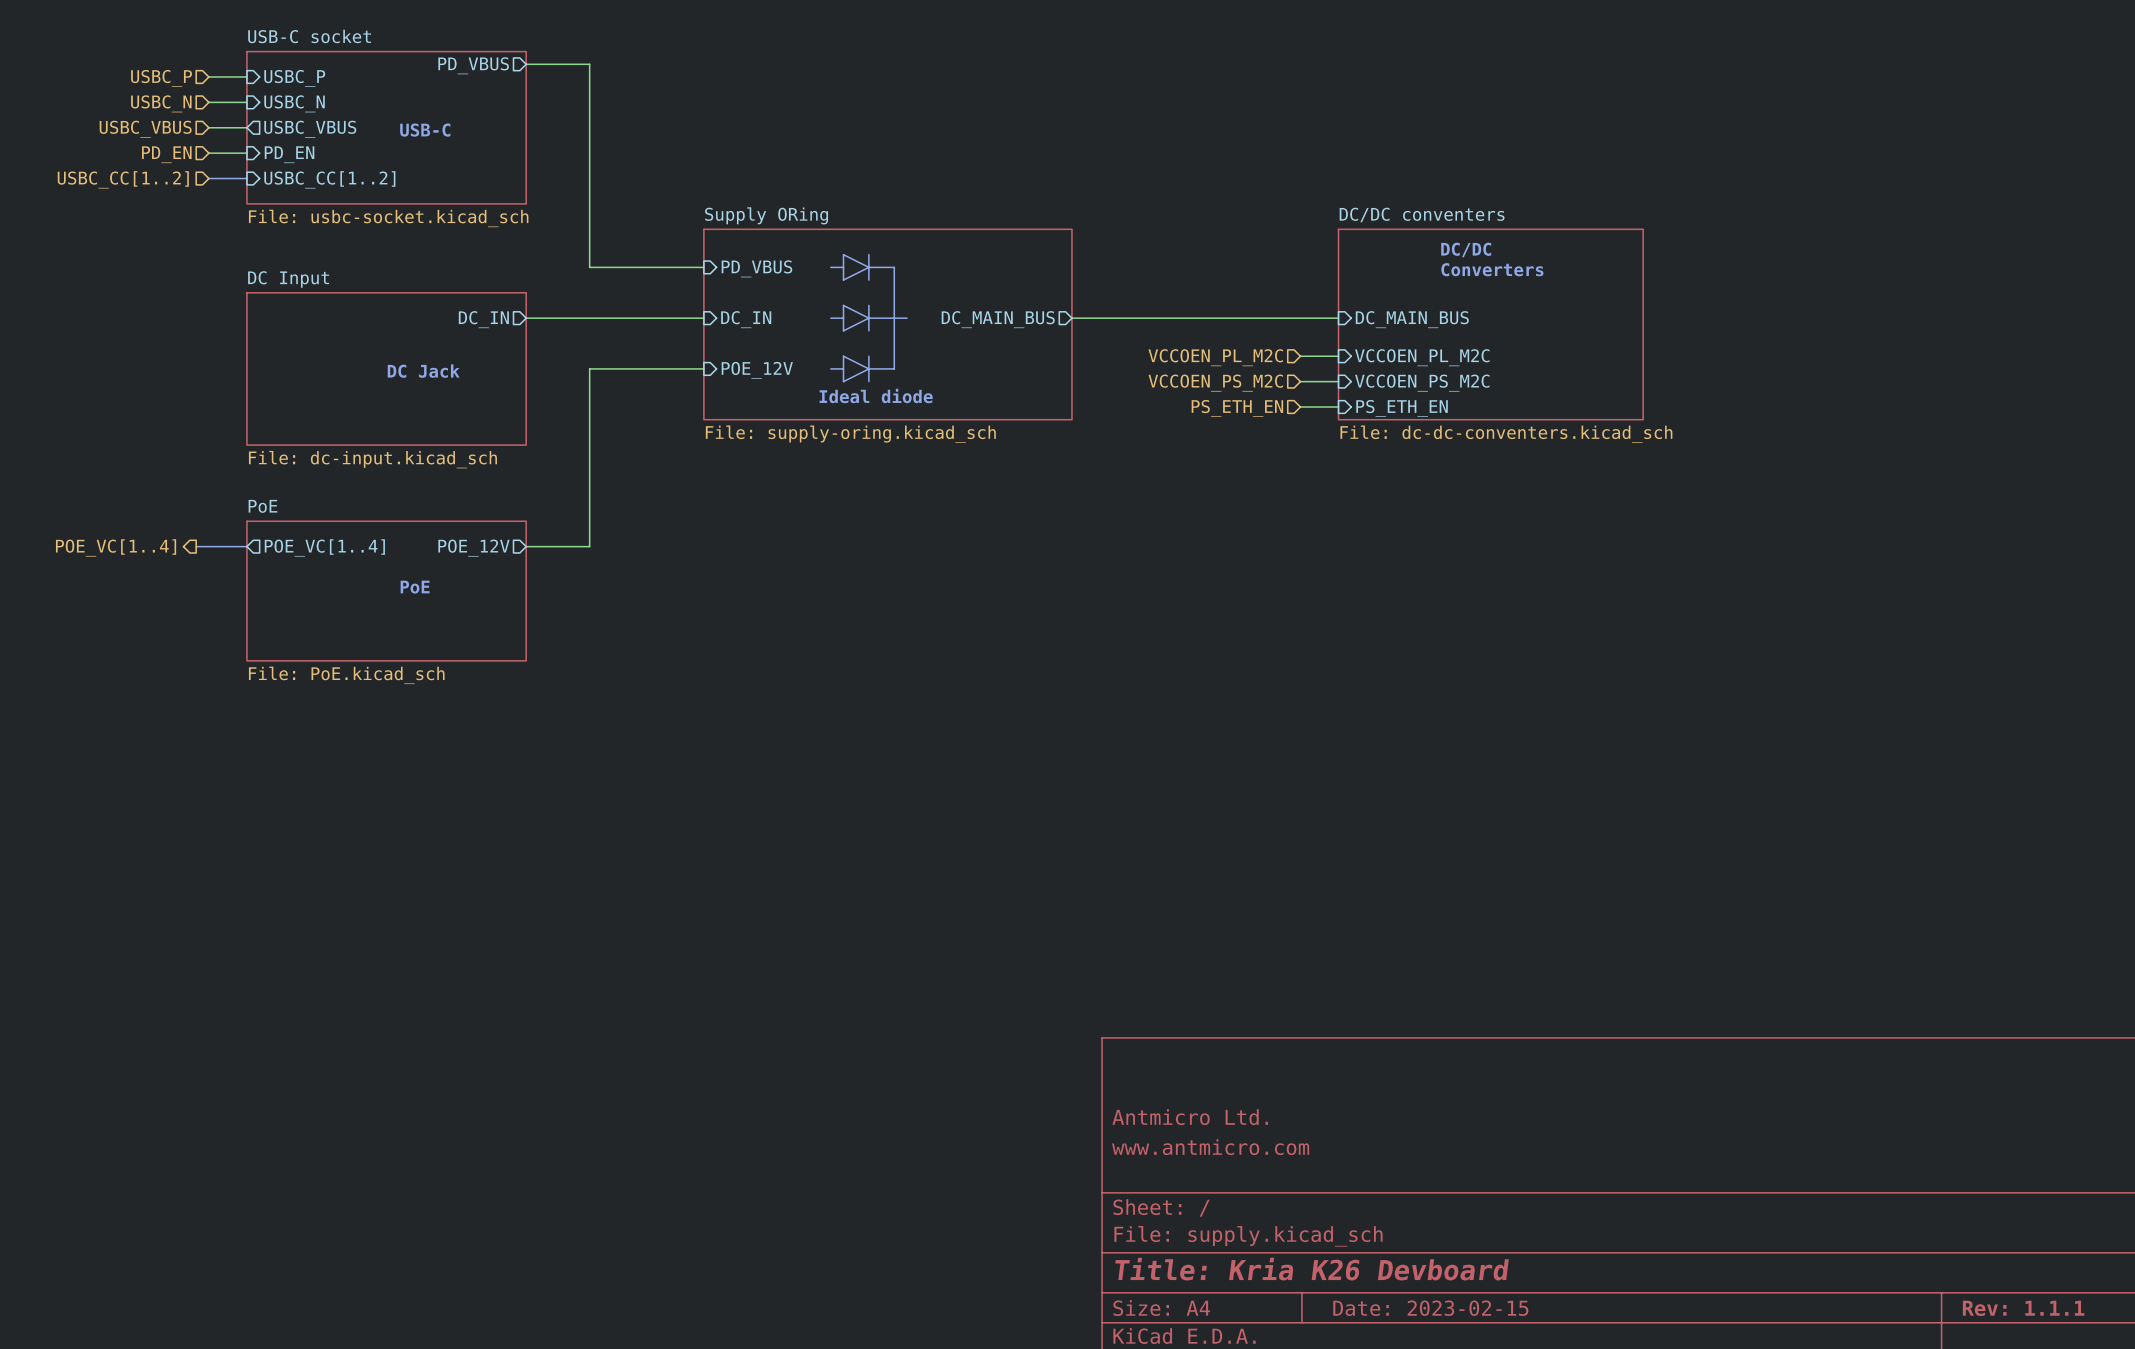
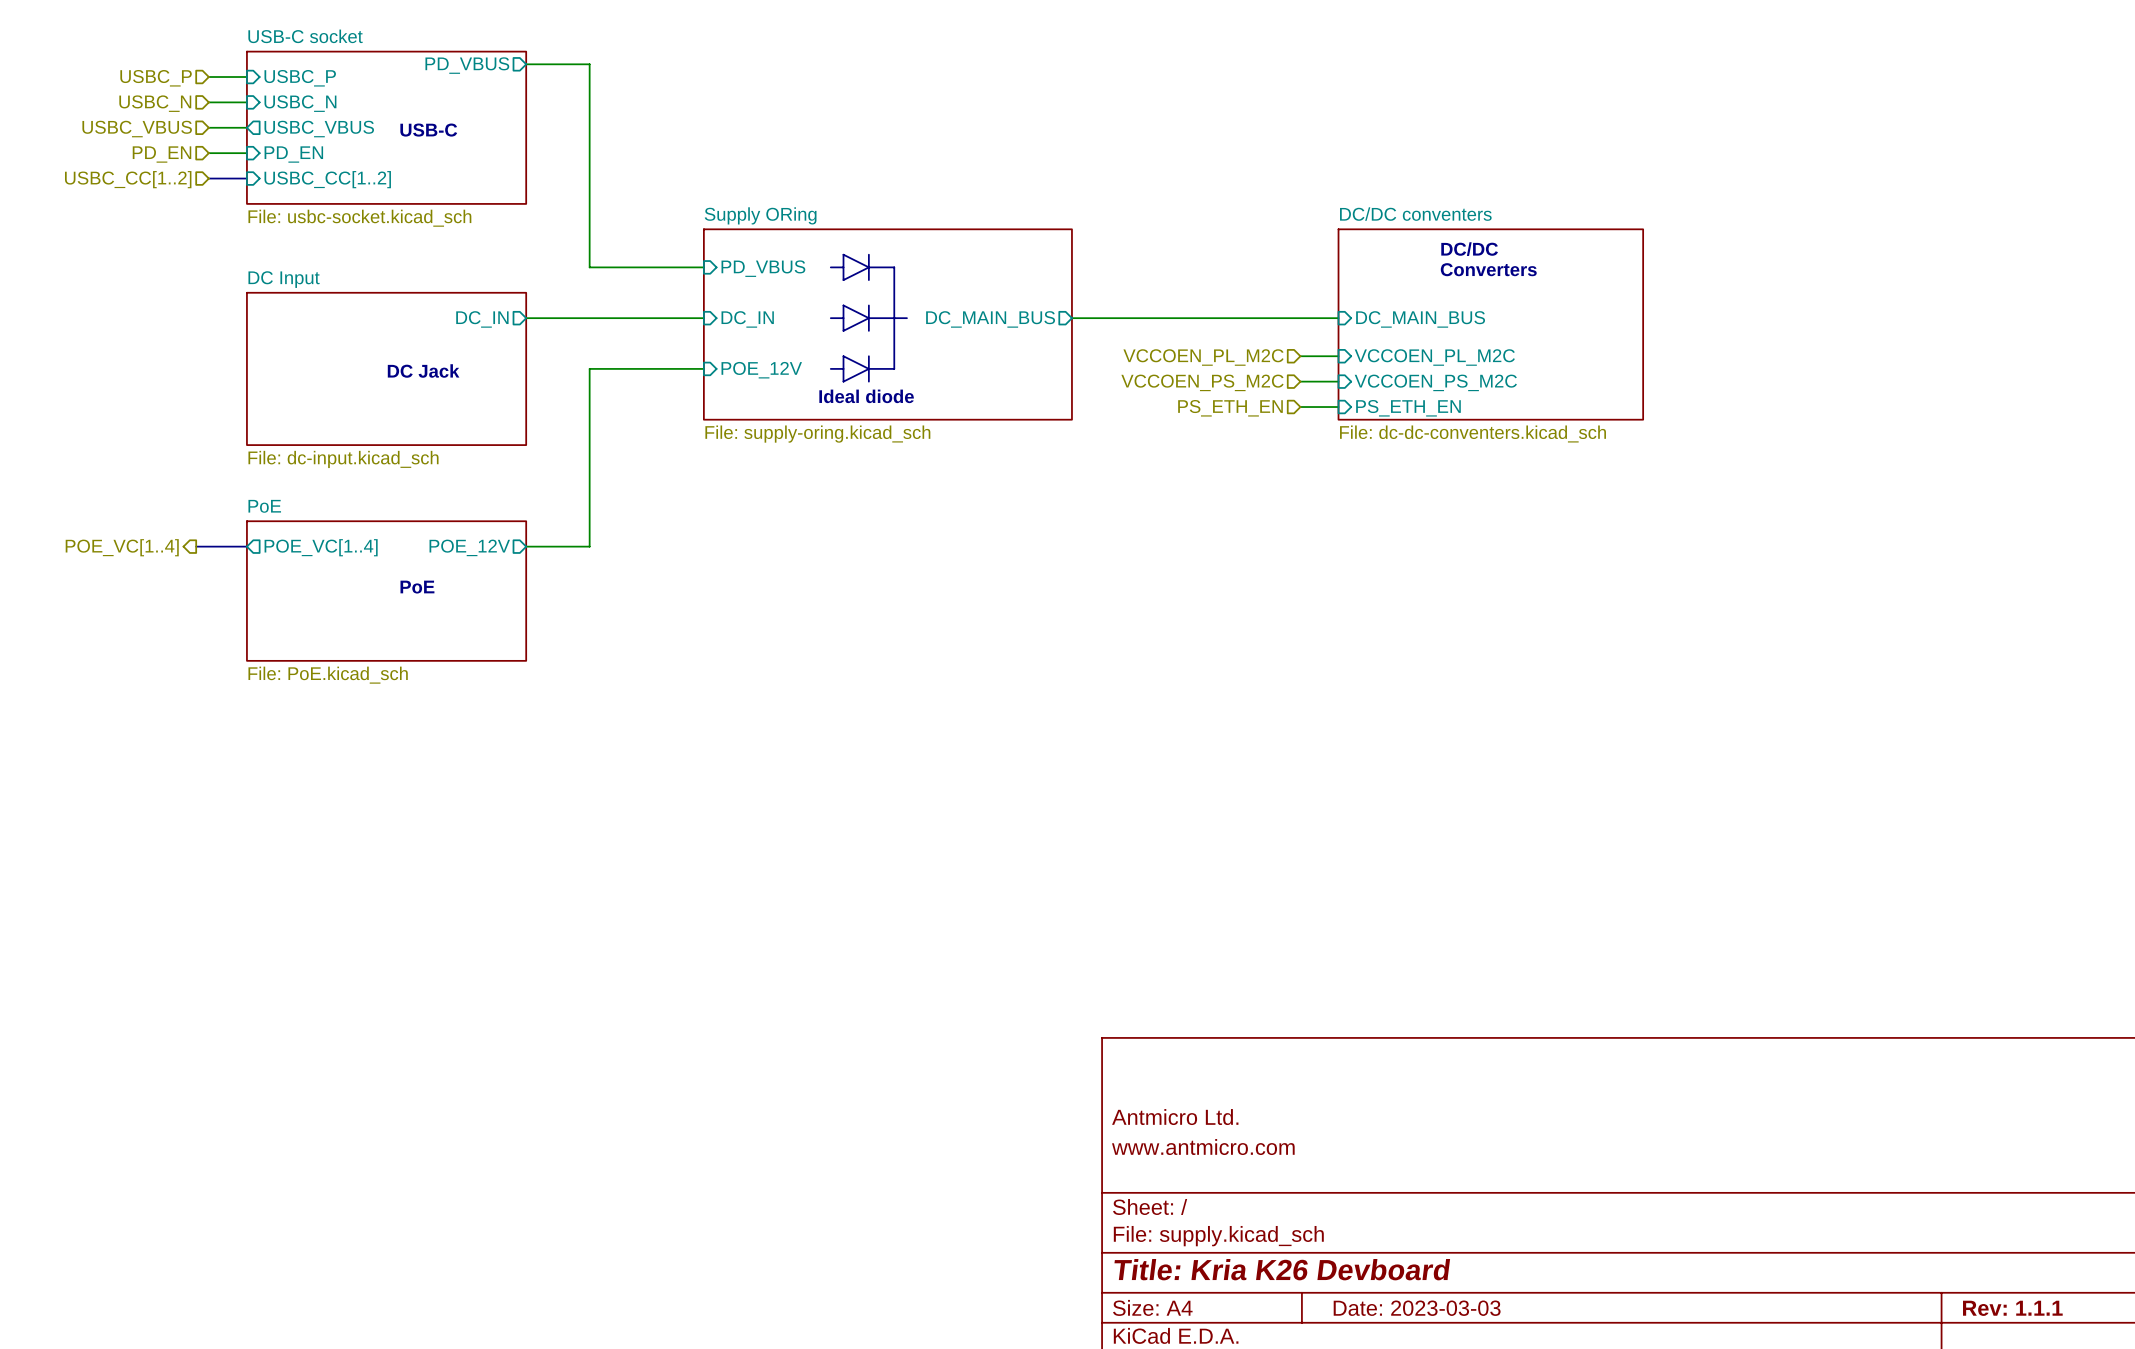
title block: Date: 2023-02-15 (1430, 1308) -> Date: 2023-03-03 (1417, 1308)

